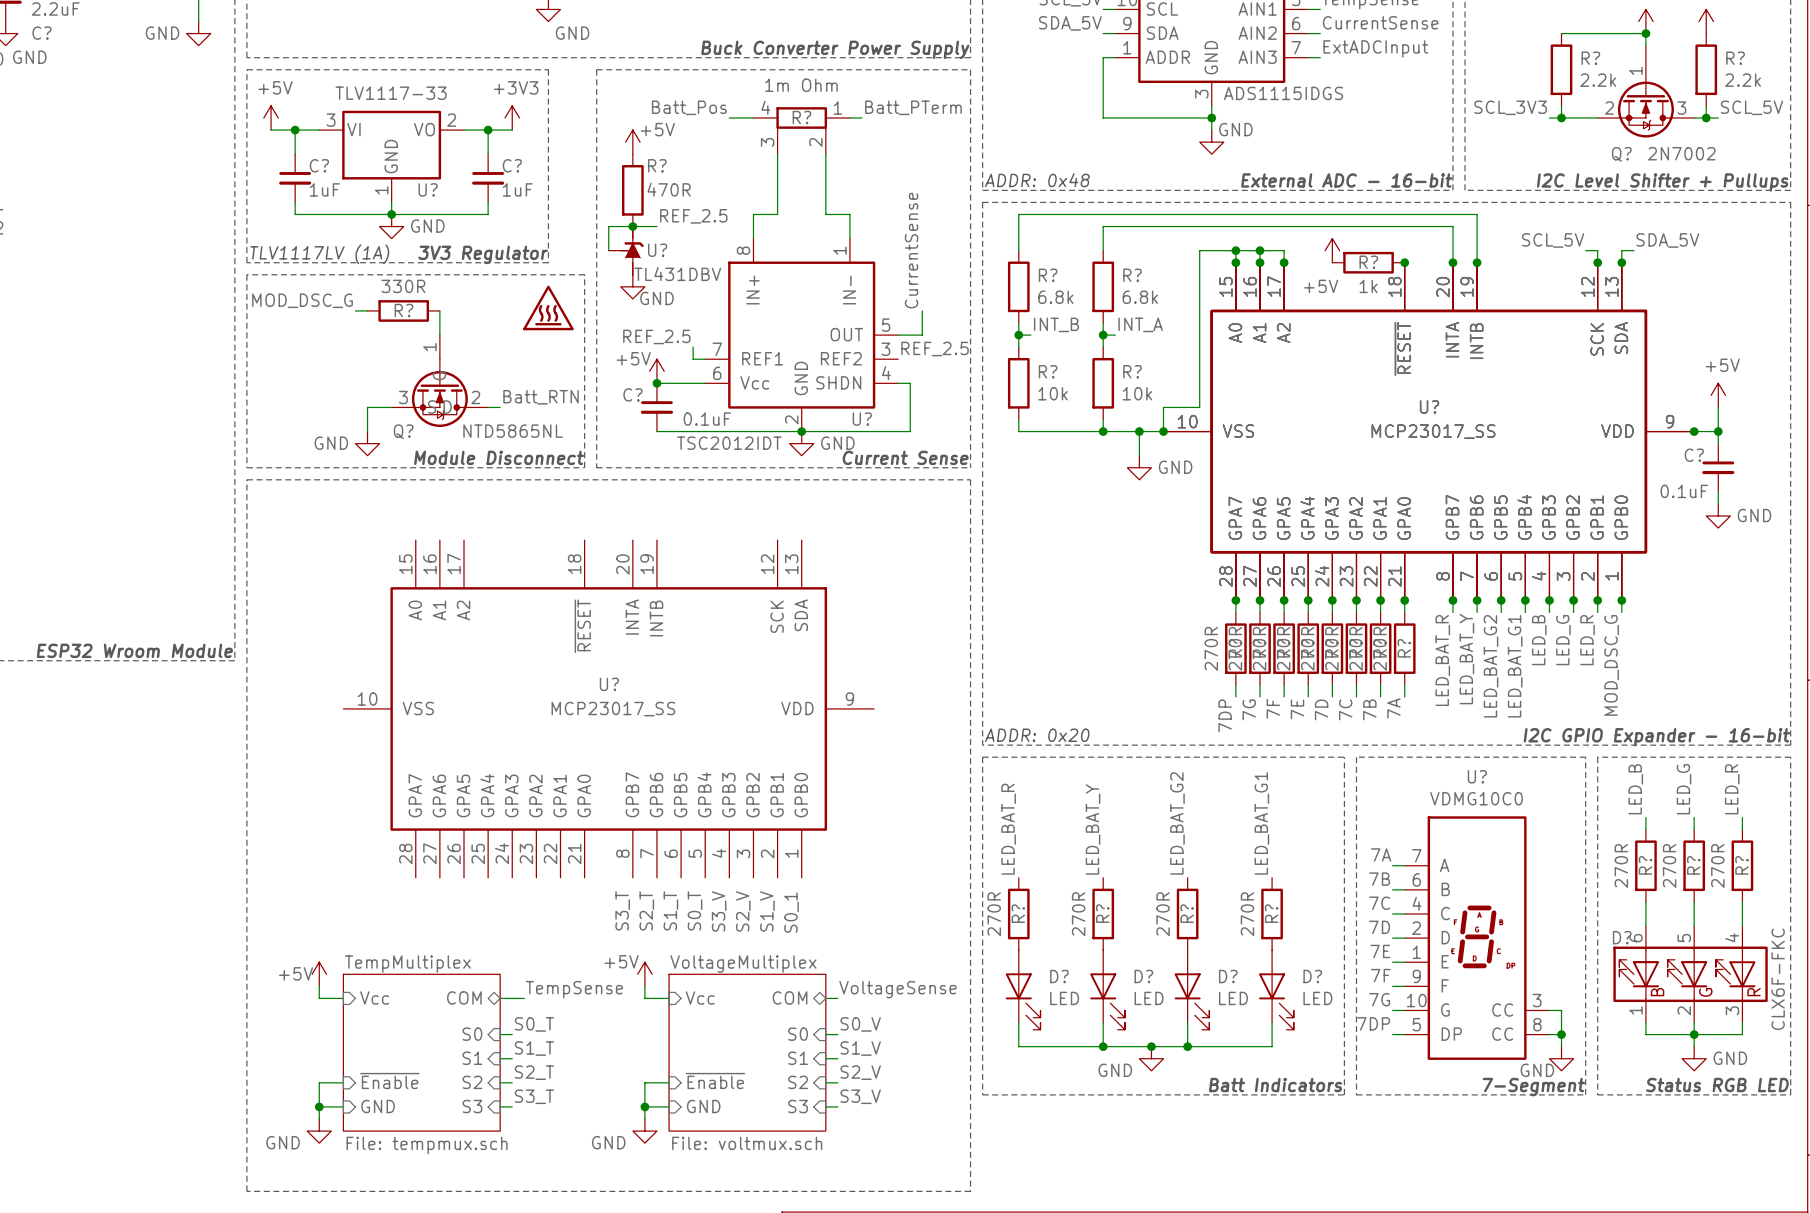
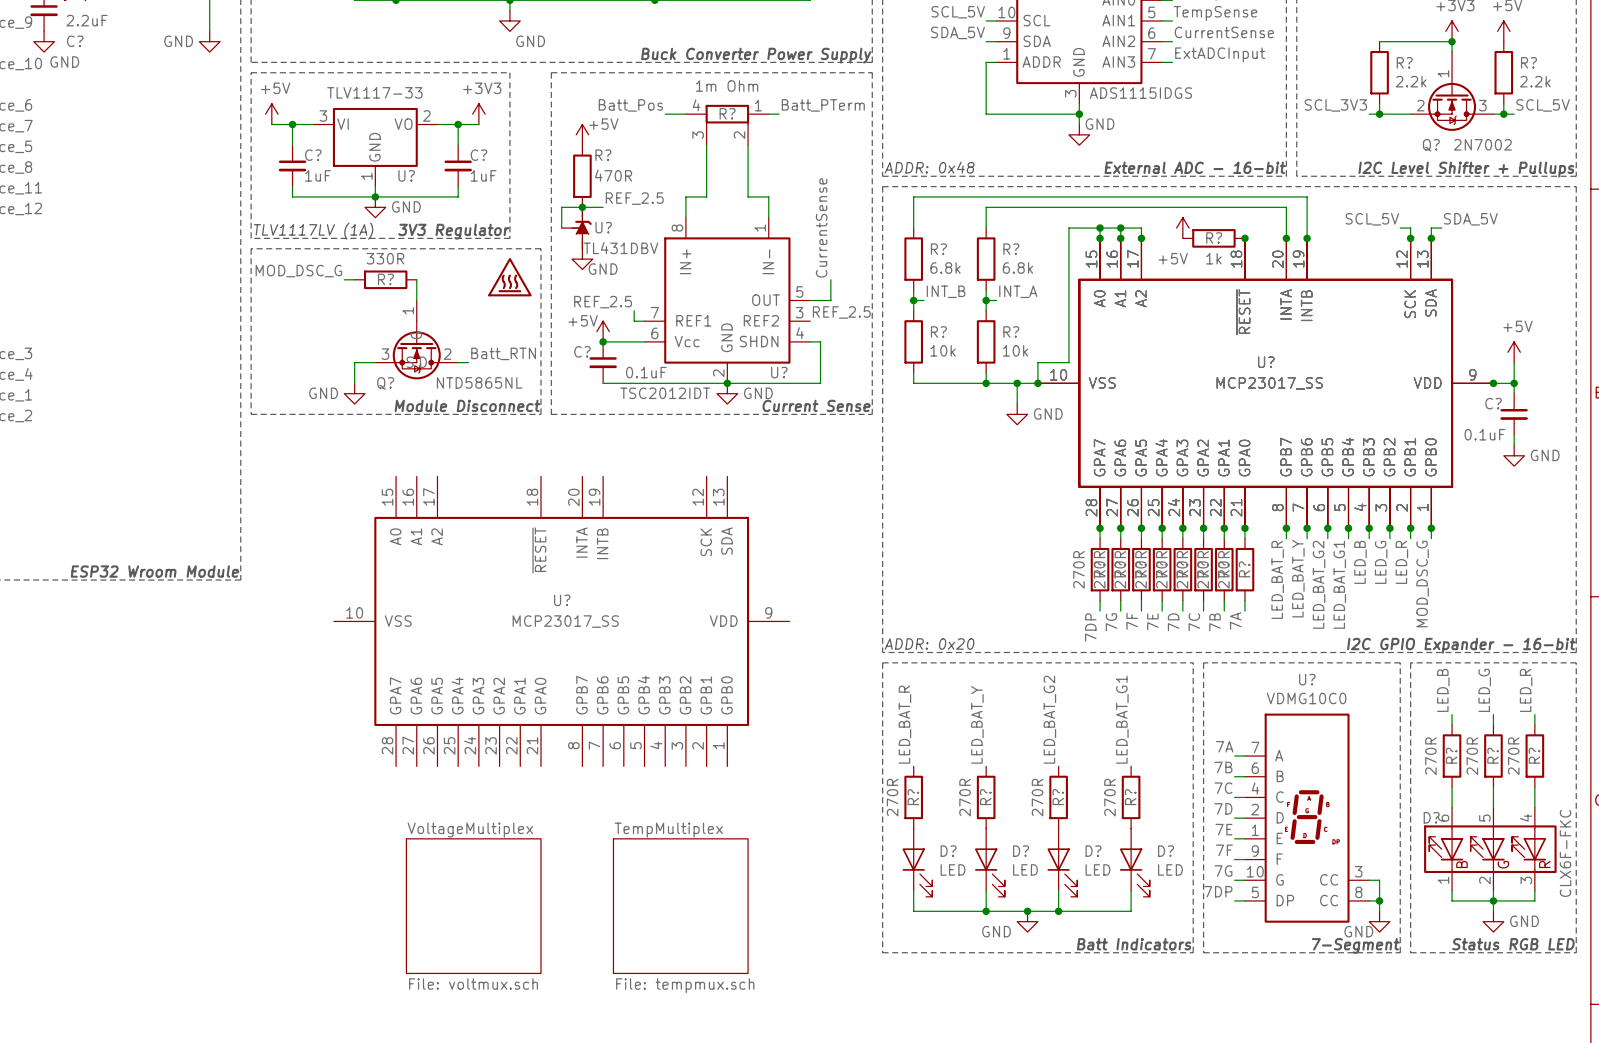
line: (246, 479) (970, 479) (970, 1191) (246, 1191) (246, 479) -> none
label: S3_T (622, 910) -> none
label: S2_T (646, 910) -> none
label: S1_T (670, 910) -> none
label: S0_T (695, 910) -> none
label: S3_V (719, 911) -> none
label: S2_V (743, 911) -> none
label: S1_V (767, 911) -> none
label: S0_1 (791, 912) -> none
power symbol: +5V (319, 974) -> none
power symbol: +5V (644, 974) -> none
wire: (319, 986) (319, 998) (343, 998) -> none
wire: (644, 986) (644, 998) (669, 998) -> none
label: TempSense (574, 989) -> none
label: VoltageSense (897, 989) -> none
sheet pin: Vcc (374, 997) -> none
sheet pin: COM (464, 997) -> none
sheet pin: Vcc (700, 997) -> none
sheet pin: COM (790, 997) -> none
wire: (500, 998) (524, 998) -> none
wire: (825, 998) (837, 998) -> none
label: S0_T (534, 1024) -> none
label: S0_V (860, 1024) -> none
sheet pin: S0 (472, 1034) -> none
wire: (500, 1034) (512, 1034) -> none
sheet pin: S0 (798, 1034) -> none
wire: (825, 1034) (837, 1034) -> none
sheet VoltageMultiplex: none -> File: voltmux.sch (473, 906)
sheet TempMultiplex: none -> File: tempmux.sch (680, 906)
label: S1_T (534, 1048) -> none
label: S1_V (860, 1048) -> none
sheet TempMultiplex: File: tempmux.sch (421, 1052) -> none
sheet VoltageMultiplex: File: voltmux.sch (747, 1052) -> none
sheet pin: S1 (472, 1058) -> none
wire: (500, 1058) (512, 1058) -> none
sheet pin: S1 (798, 1058) -> none
wire: (825, 1058) (837, 1058) -> none
label: S2_T (534, 1072) -> none
label: S2_V (860, 1072) -> none
sheet pin: ~{Enable} (389, 1081) -> none
sheet pin: ~{Enable} (715, 1081) -> none
wire: (343, 1082) (319, 1082) (319, 1119) -> none
sheet pin: S2 (472, 1082) -> none
wire: (500, 1082) (512, 1082) -> none
wire: (669, 1082) (644, 1082) (644, 1119) -> none
sheet pin: S2 (798, 1082) -> none
wire: (825, 1082) (837, 1082) -> none
label: S3_T (534, 1096) -> none
label: S3_V (860, 1096) -> none
wire: (319, 1106) (343, 1106) -> none
junction: (319, 1106) -> none
sheet pin: GND (378, 1106) -> none
sheet pin: S3 (472, 1106) -> none
wire: (500, 1106) (512, 1106) -> none
wire: (644, 1106) (669, 1106) -> none
junction: (644, 1106) -> none
sheet pin: GND (703, 1106) -> none
sheet pin: S3 (798, 1106) -> none
wire: (825, 1106) (837, 1106) -> none
power symbol: GND (319, 1131) -> none
power symbol: GND (644, 1131) -> none

